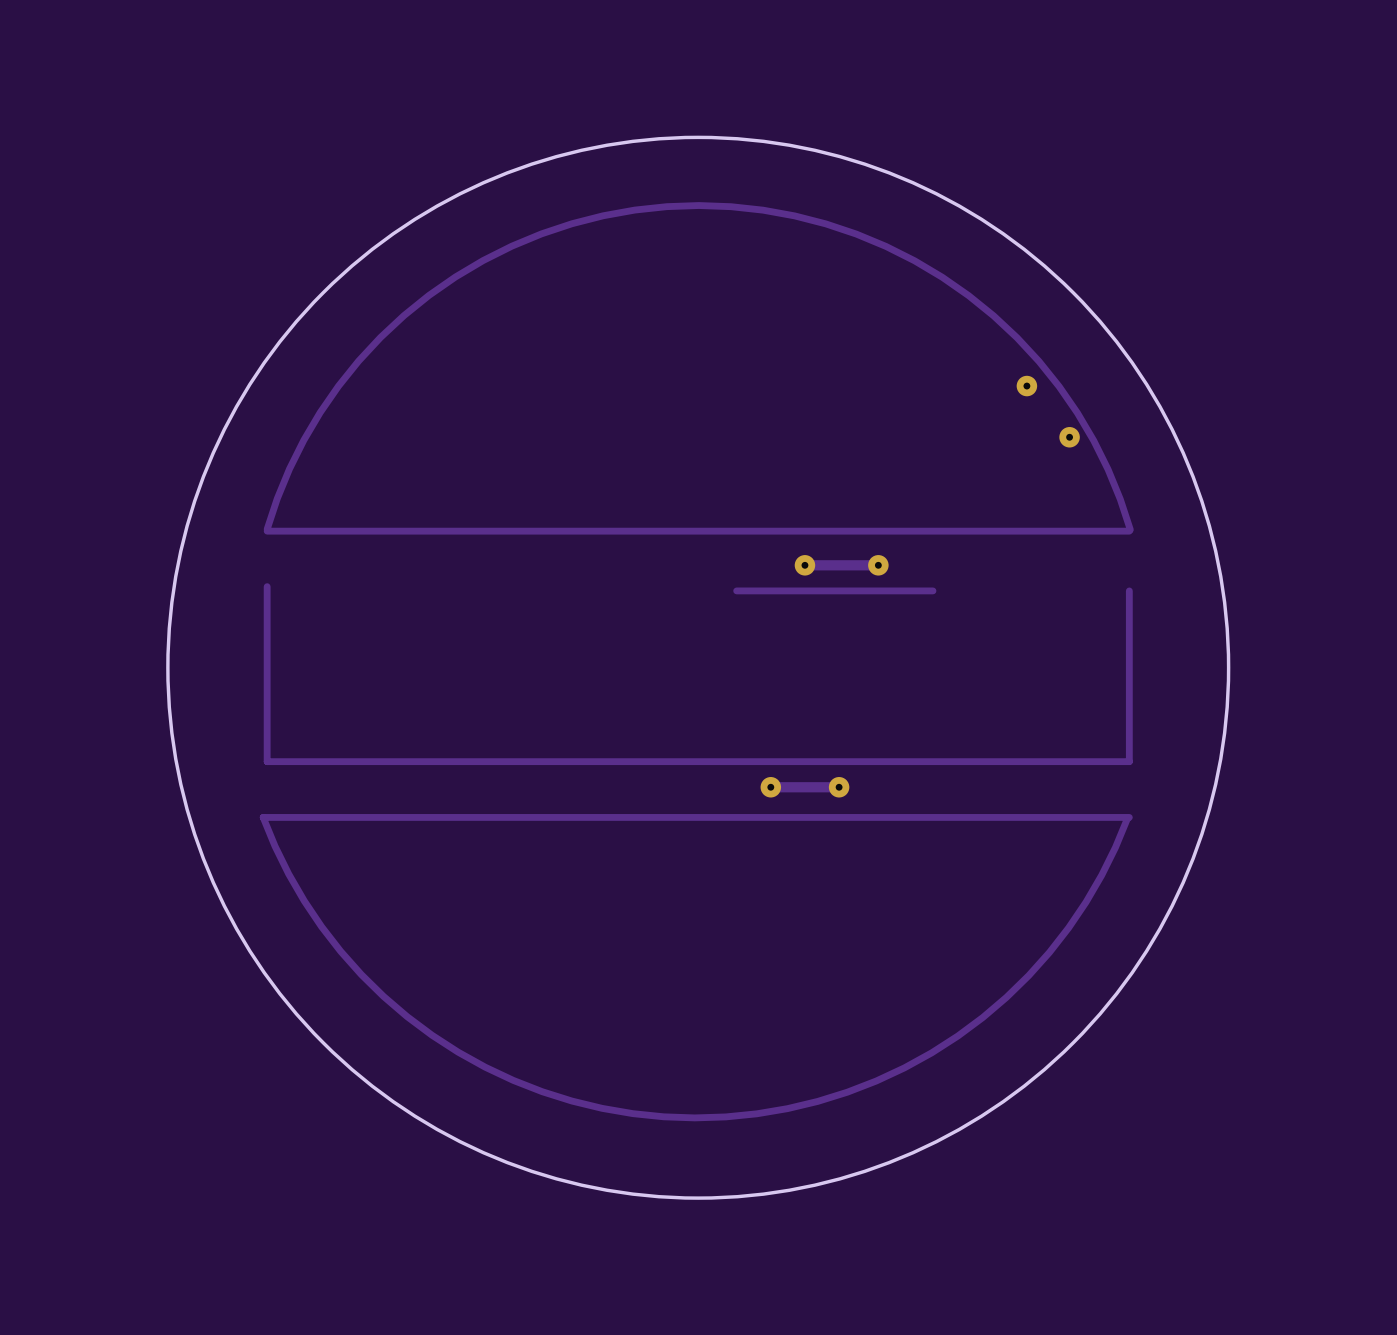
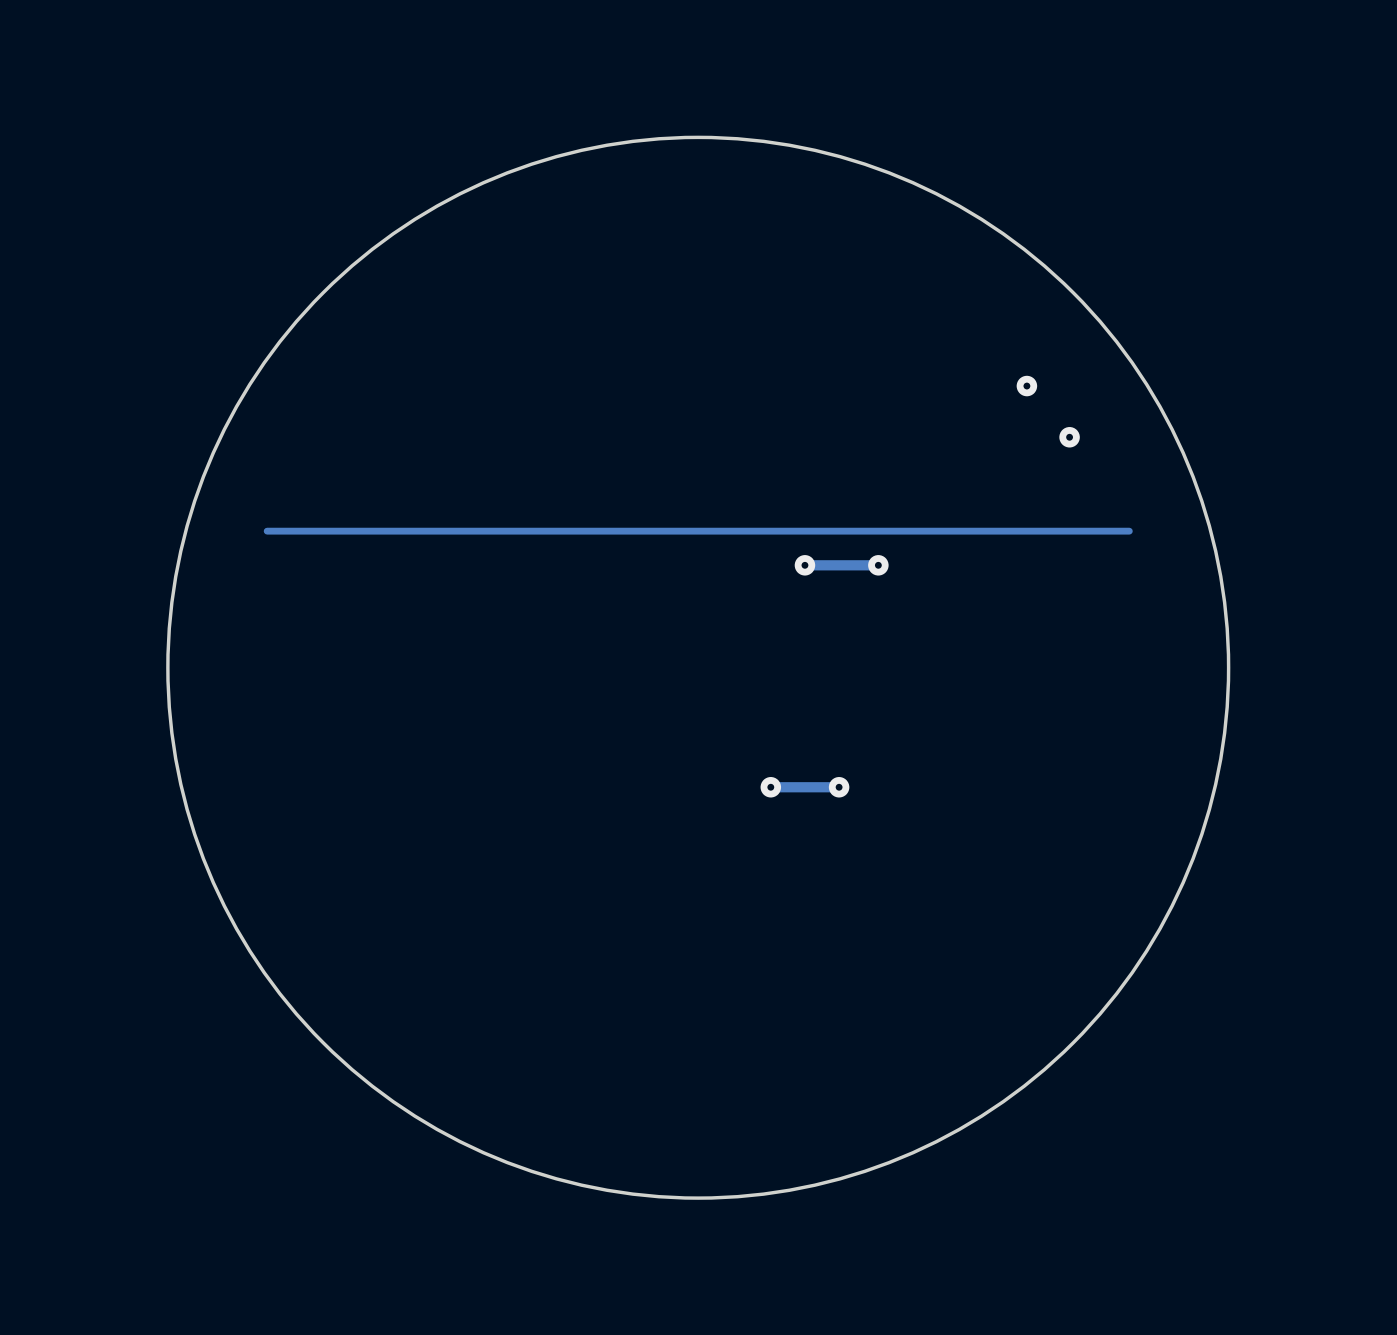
track: (267, 529) (289, 468) (320, 412) (338, 386) (380, 337) (429, 295) (483, 260) (511, 246) (572, 223) (634, 210) (698, 205) (763, 210) (825, 223) (856, 234) (914, 260) (968, 295) (1017, 337) (1059, 386) (1093, 440) (1120, 499) (1130, 529) -> none
track: (267, 586) (267, 761) (1129, 761) (1129, 590) -> none
track: (933, 590) (736, 590) -> none
track: (1129, 817) (263, 817) (275, 846) (304, 900) (340, 951) (383, 996) (432, 1035) (485, 1067) (542, 1091) (602, 1108) (663, 1116) (694, 1117) (756, 1113) (817, 1101) (847, 1092) (904, 1067) (957, 1036) (1006, 997) (1049, 952) (1068, 927) (1101, 875) (1127, 818) -> none

